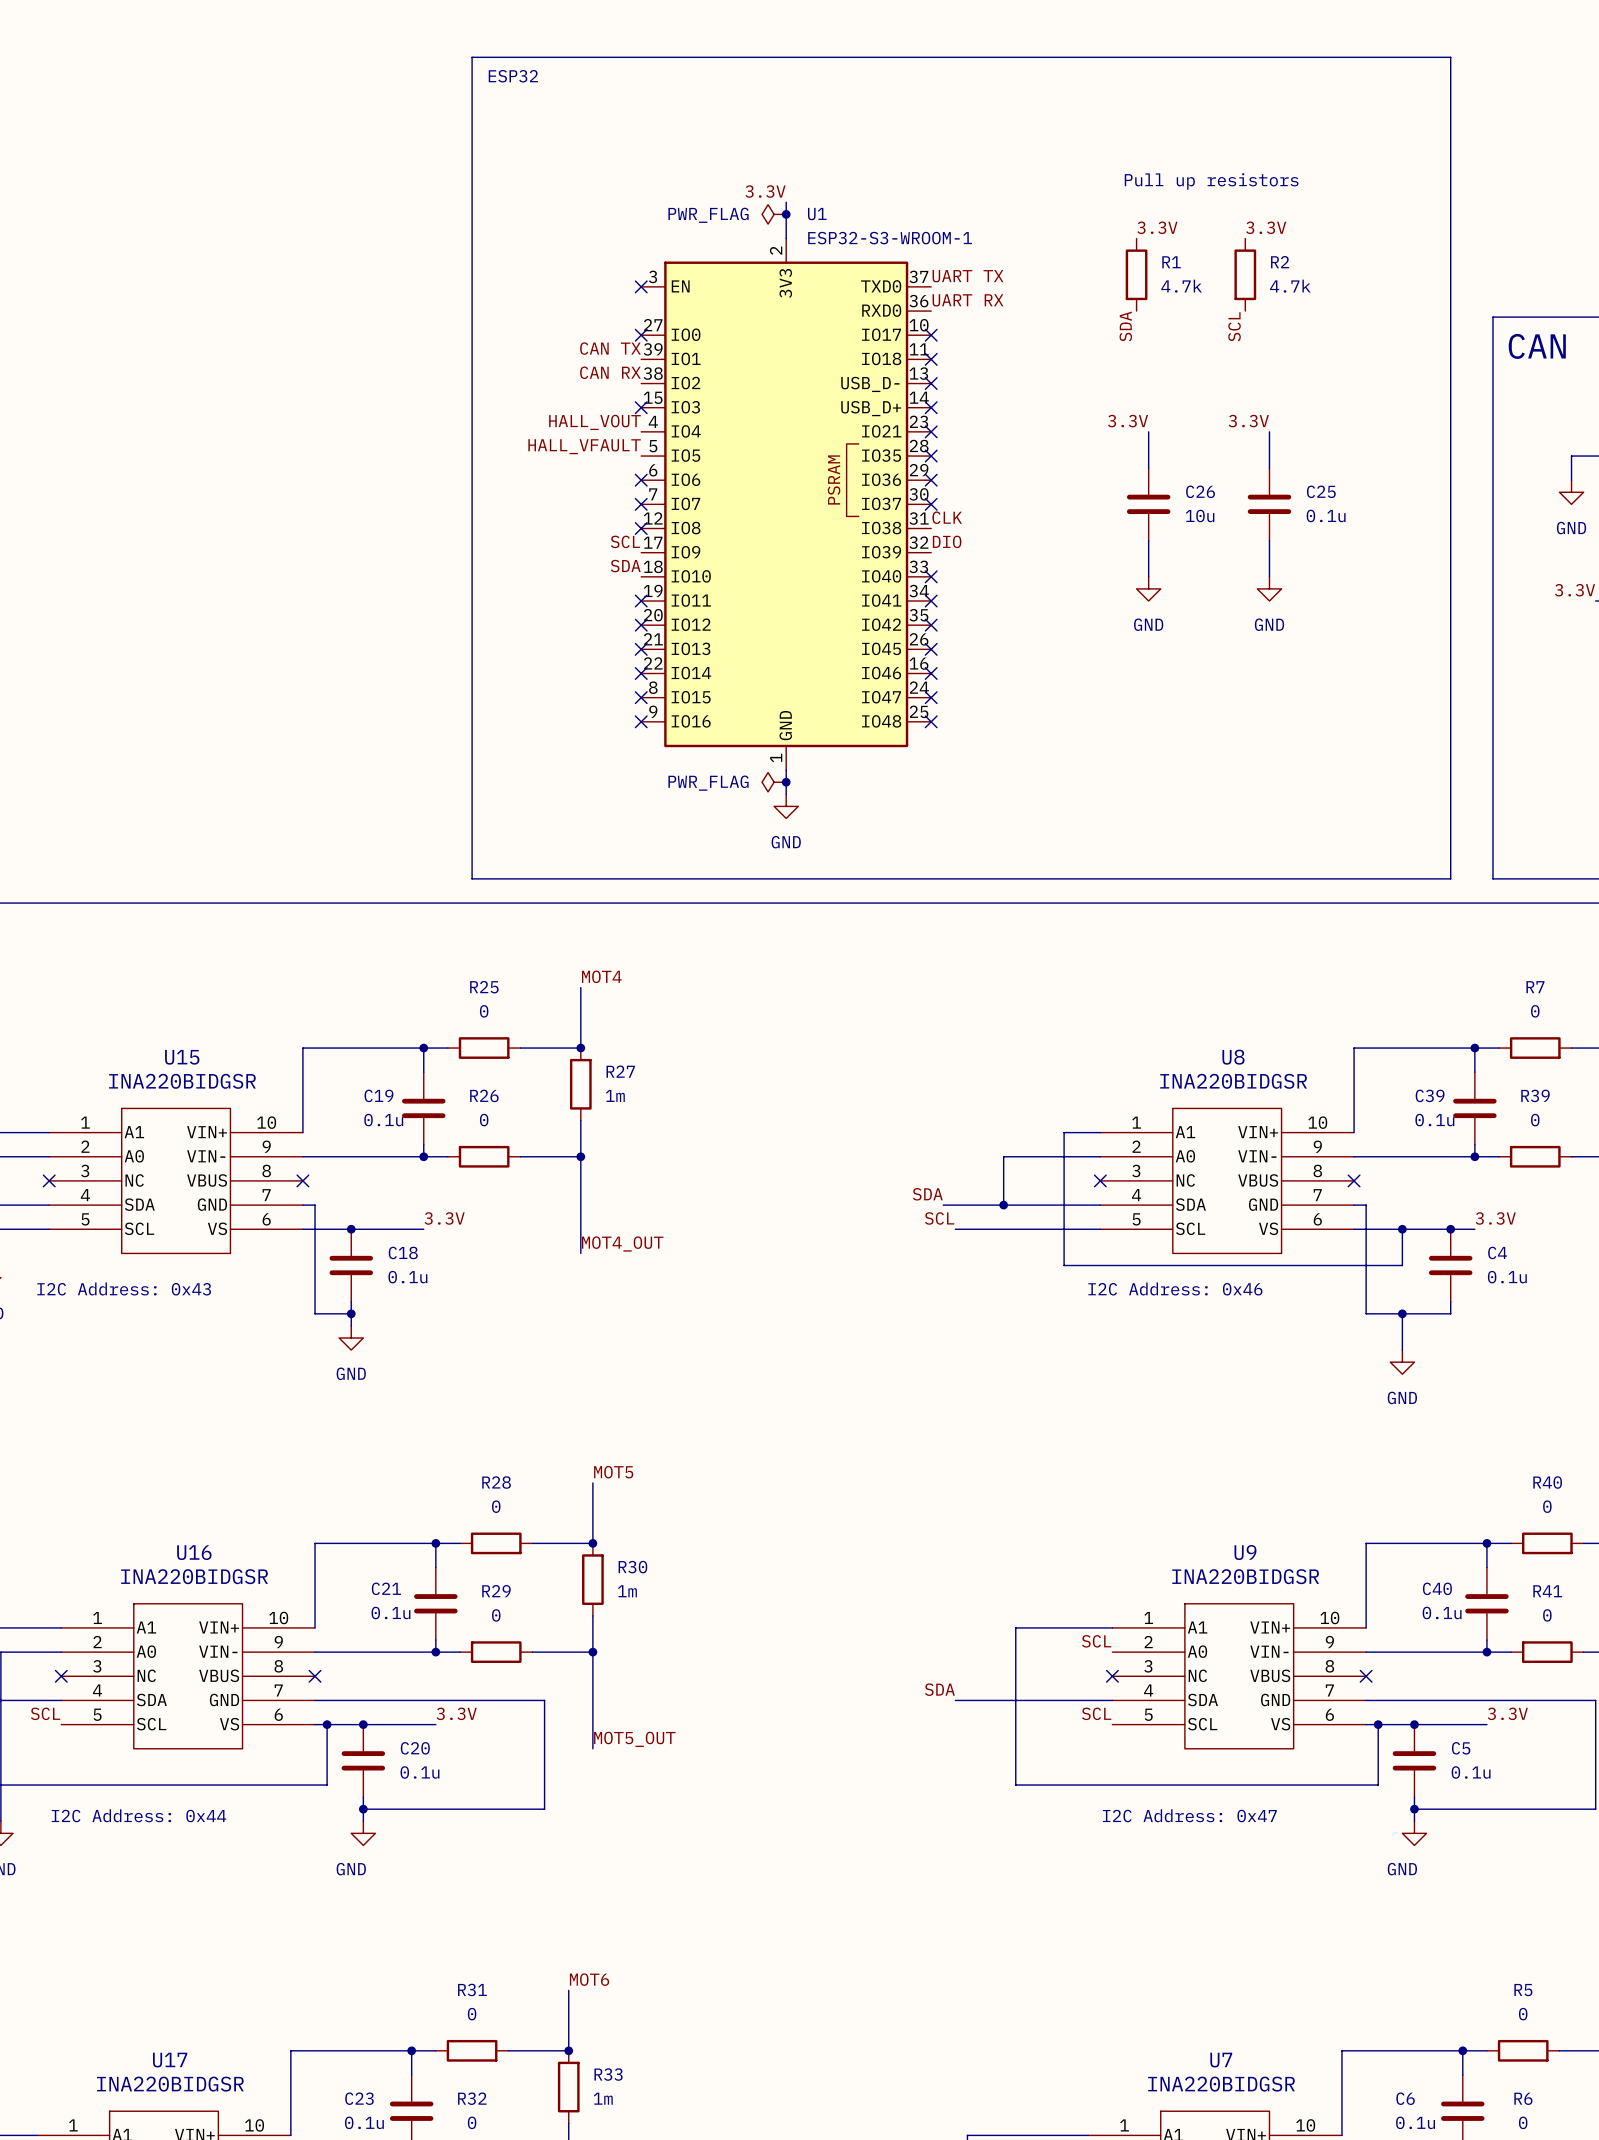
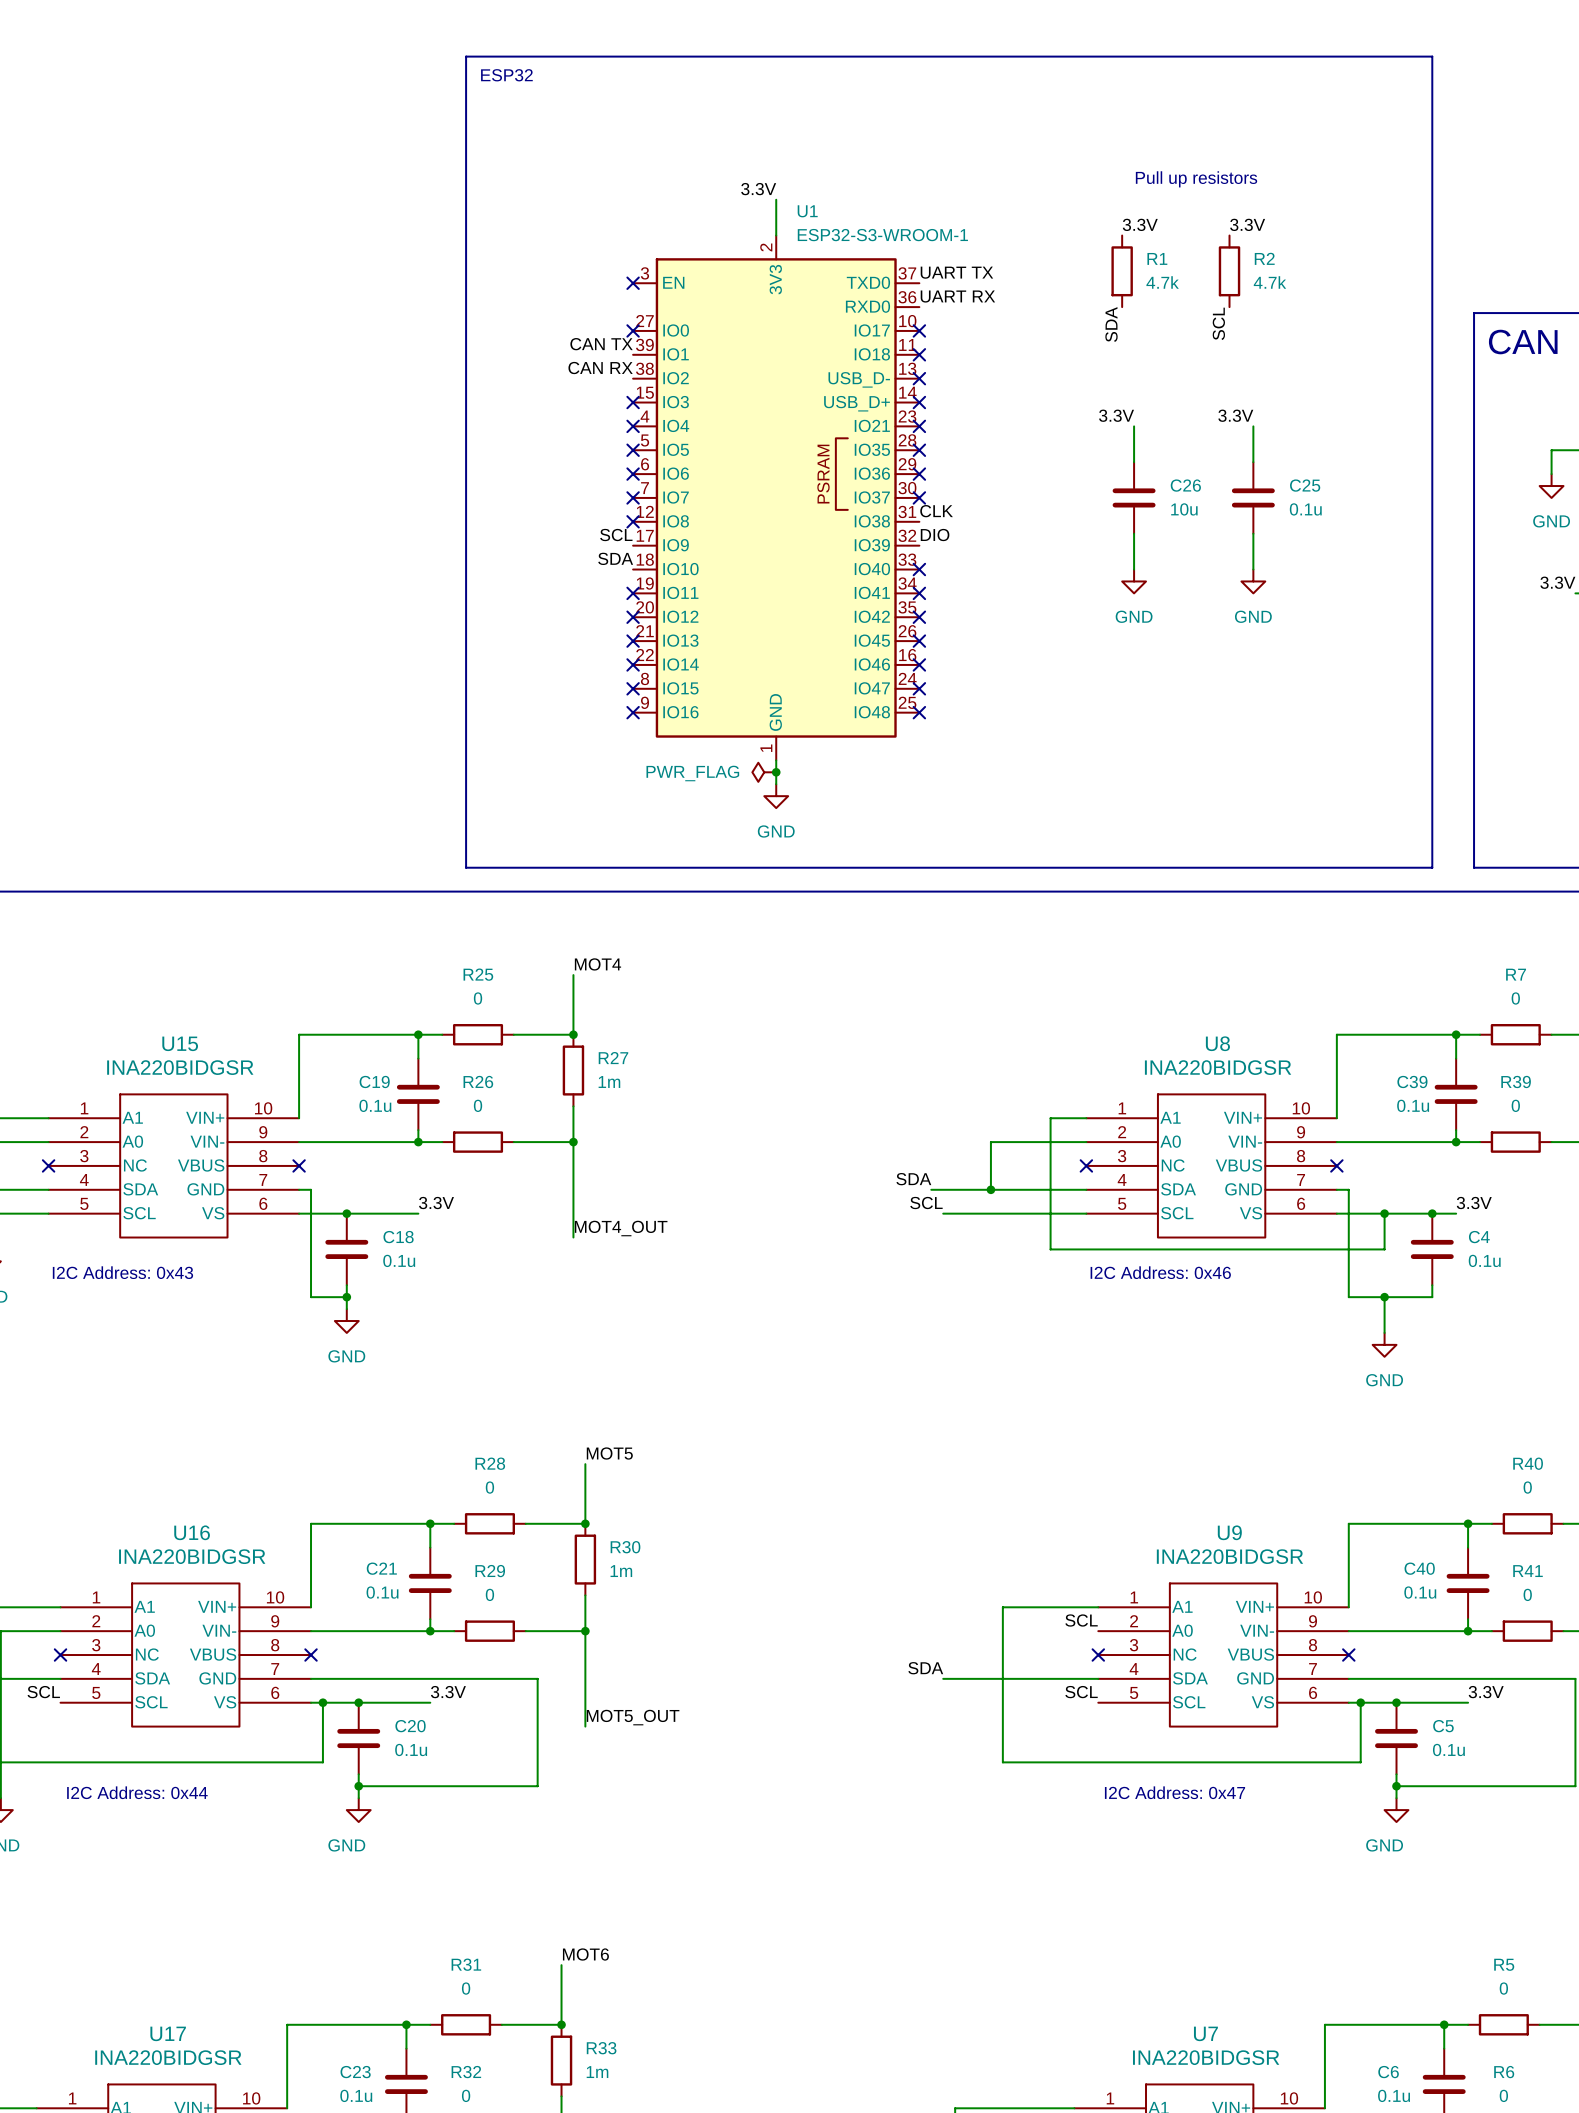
power symbol: PWR_FLAG (774, 214) -> none
junction: (786, 214) -> none
label: HALL_VOUT (594, 422) -> none
no-connect mark: none -> (633, 426)
label: HALL_VFAULT (584, 446) -> none
no-connect mark: none -> (633, 450)

